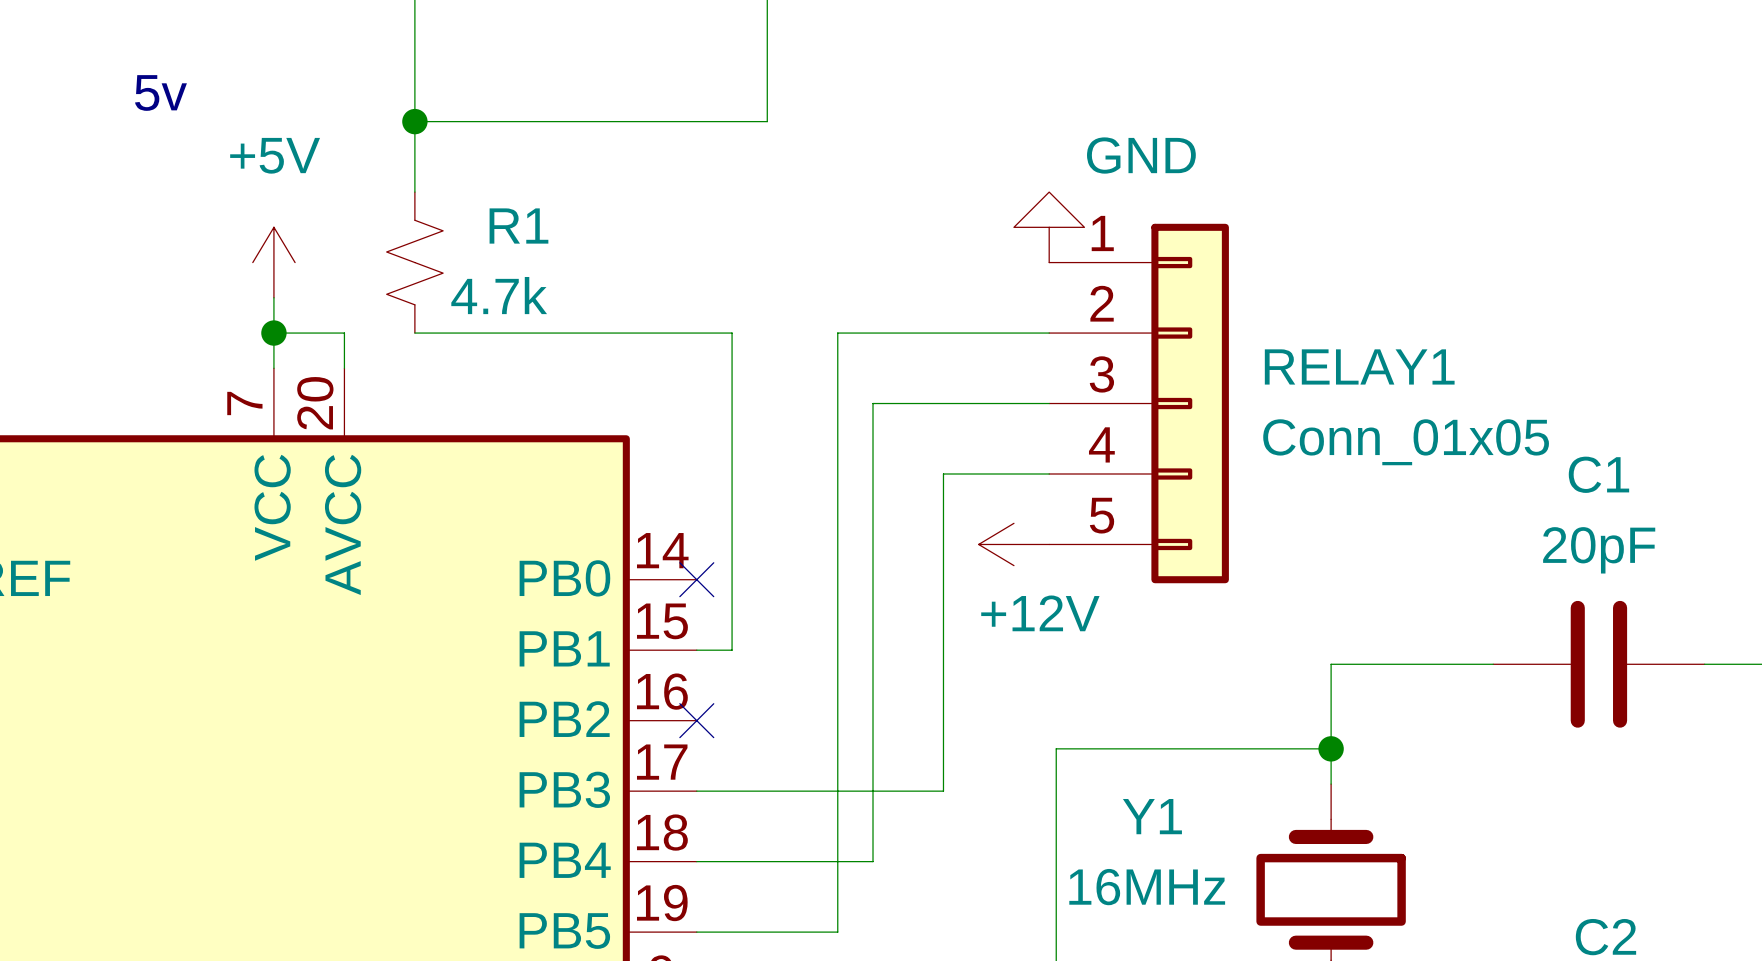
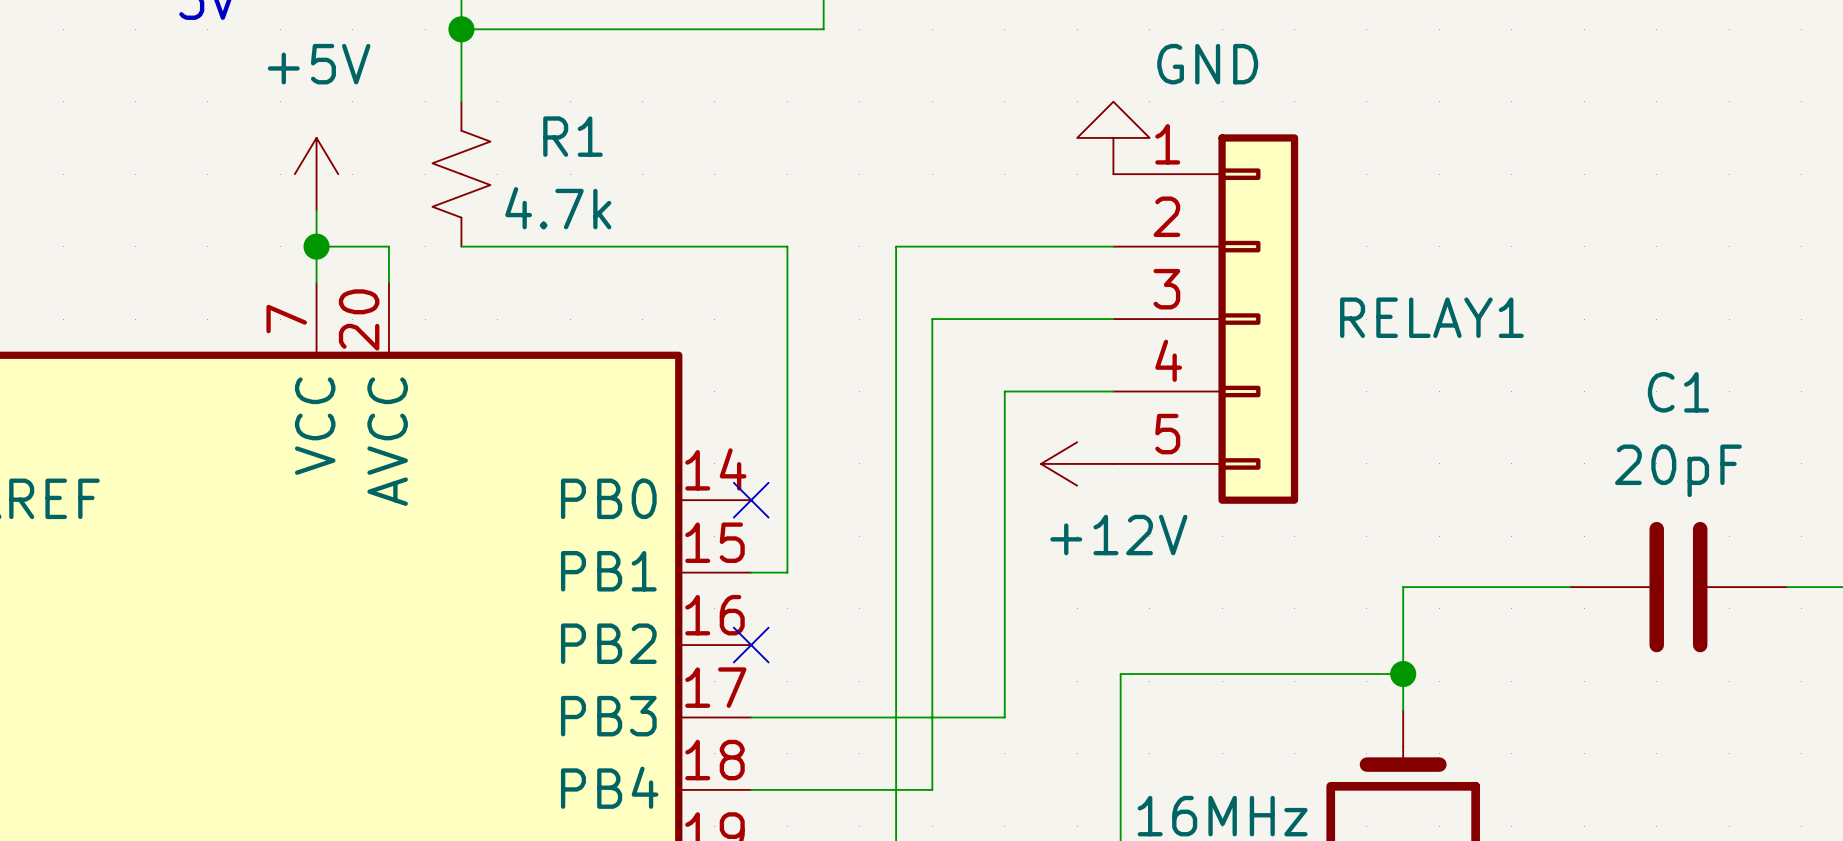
RELAY1 name position: RELAY1 (1359, 366) -> RELAY1 (1431, 317)
RELAY1 value: Conn_01x05 (1406, 442) -> none
Y1 name: Y1 (1152, 816) -> none

